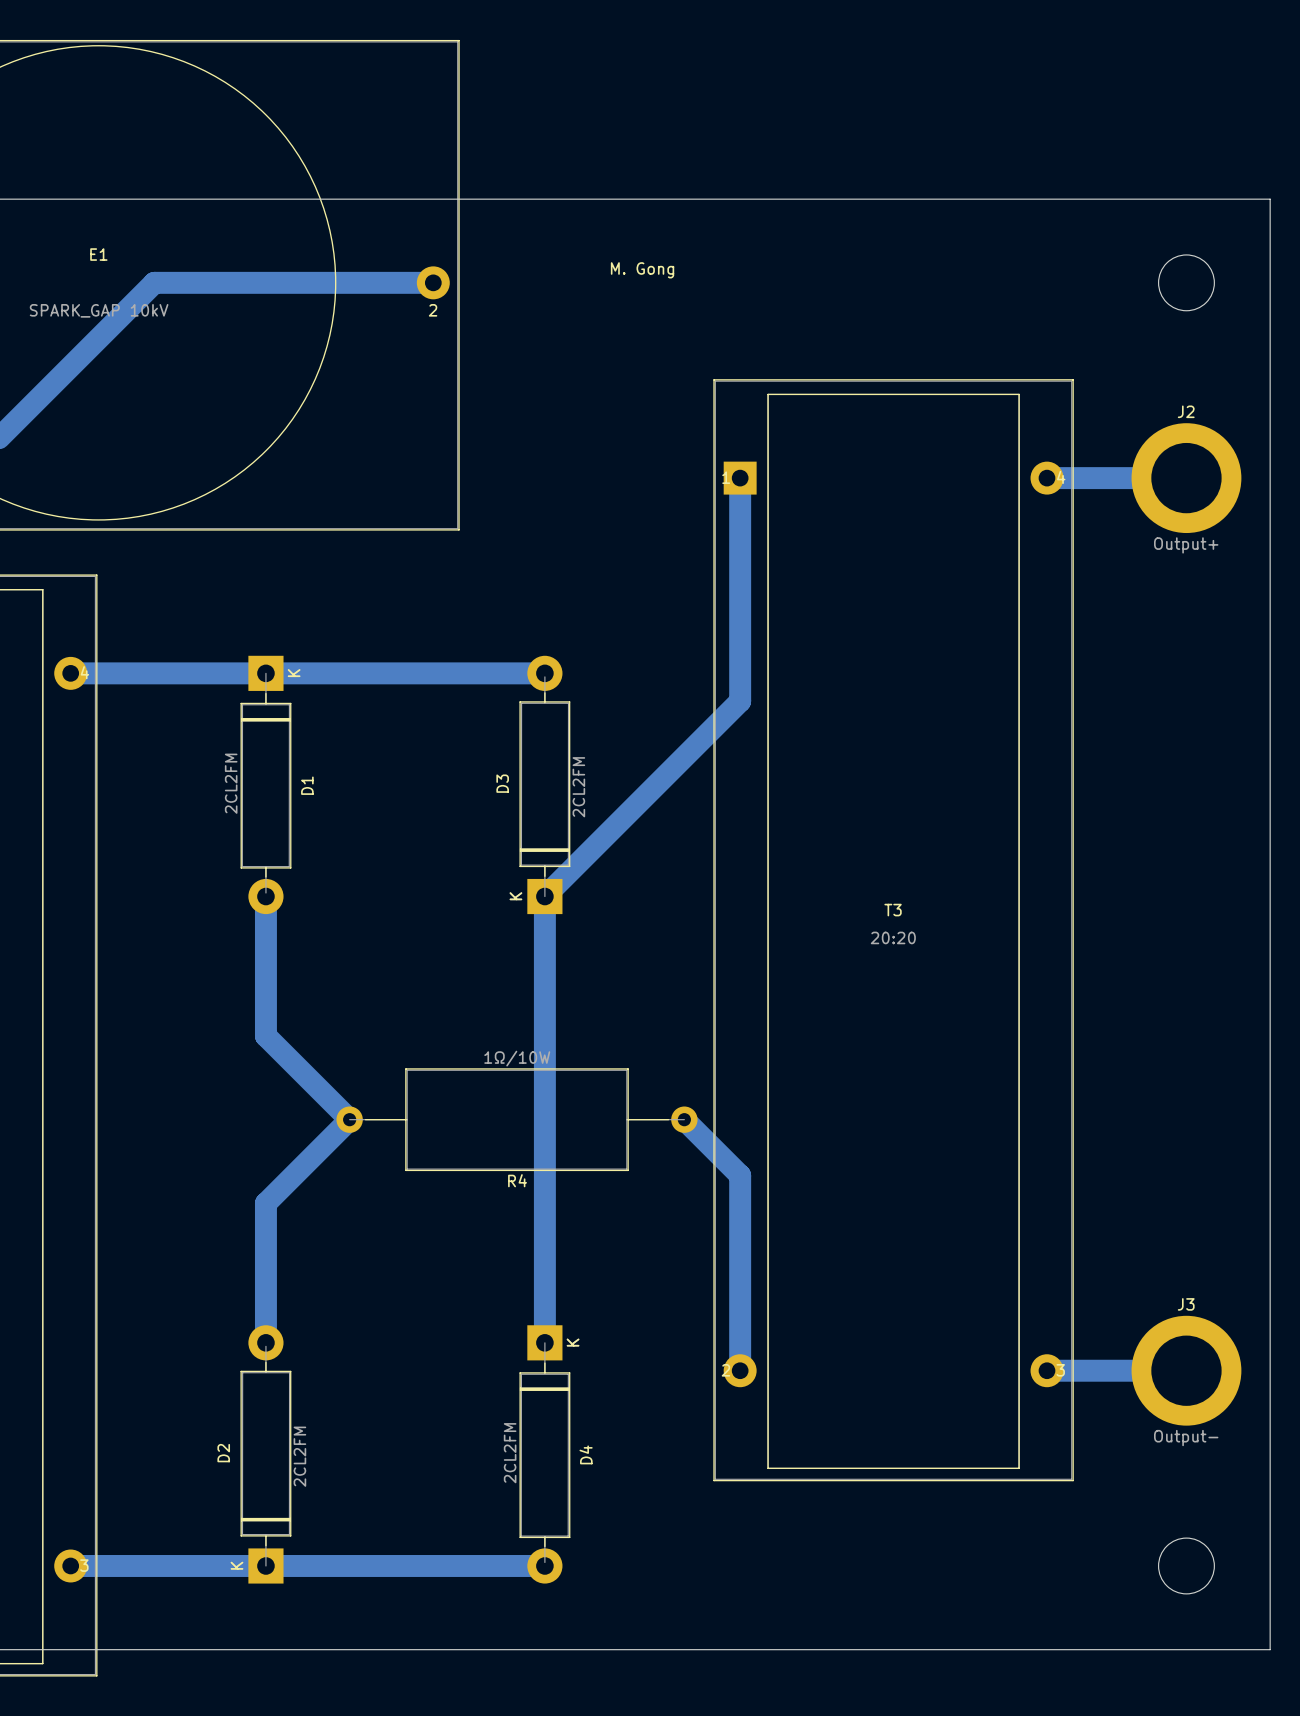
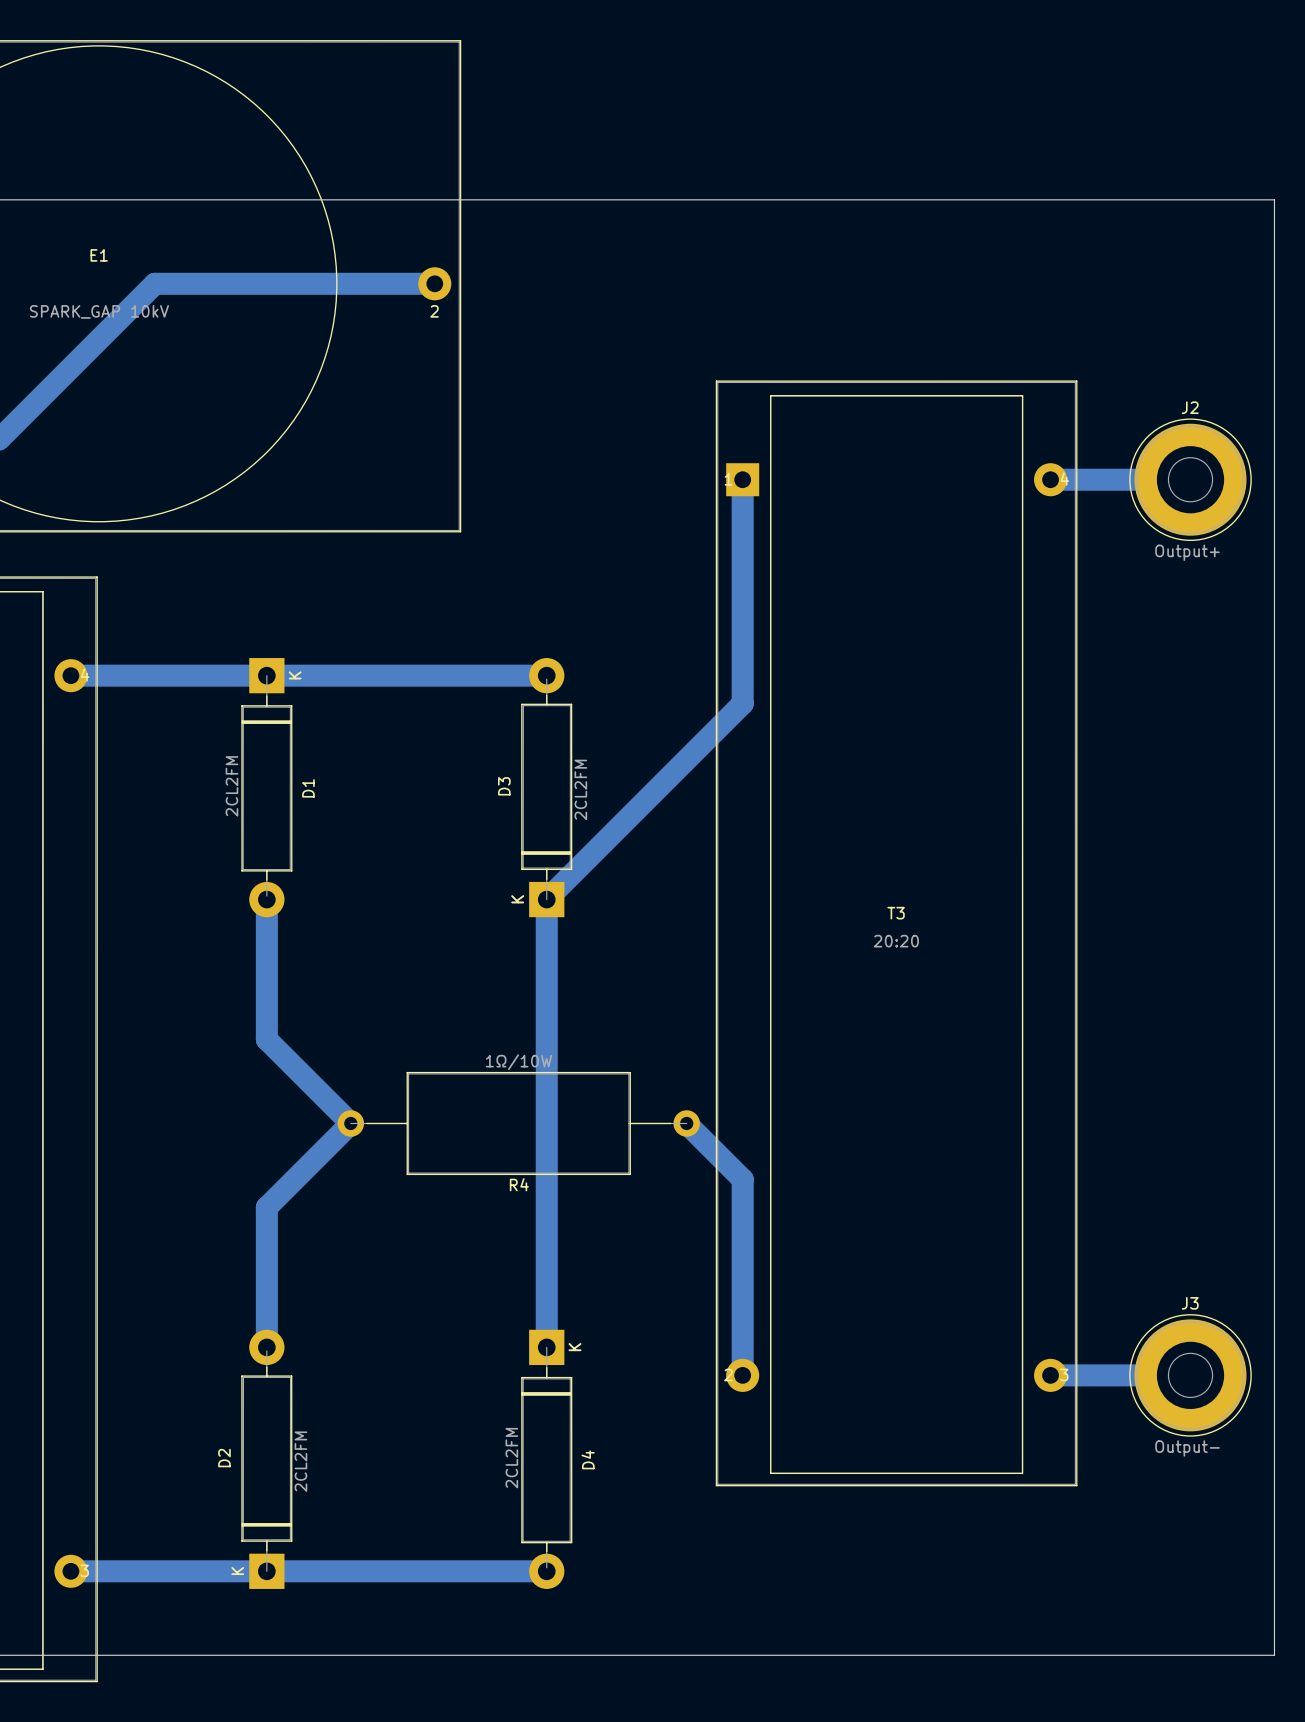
round board edge: [1158, 254, 1215, 312] -> none
text: M. Gong (642, 270) -> none
J2 footprint: [1131, 423, 1242, 534] -> [1129, 418, 1252, 542]
J3 footprint: [1131, 1315, 1242, 1426] -> [1129, 1314, 1252, 1437]
round board edge: [1158, 1537, 1215, 1595] -> none

